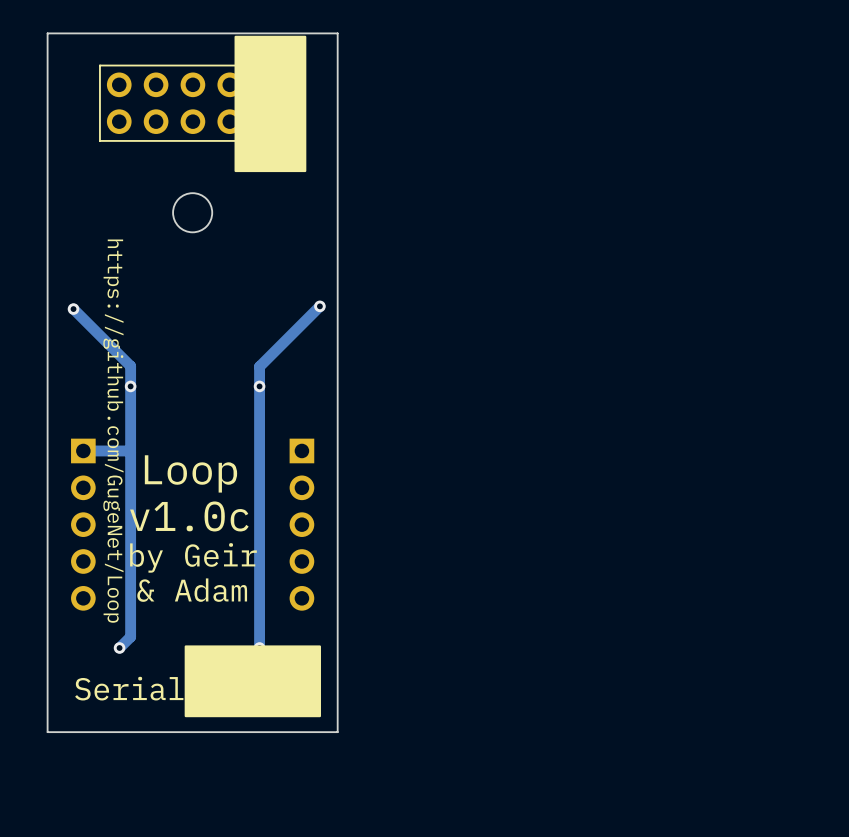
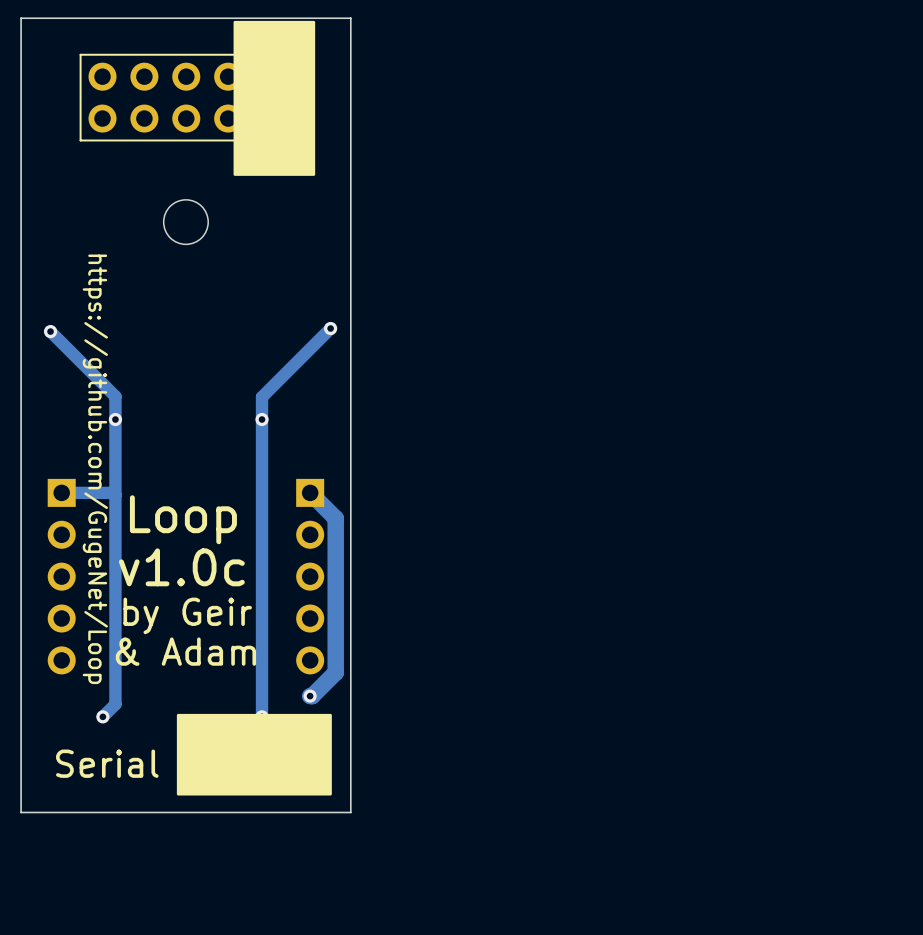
track: none -> (310, 492) (335, 518) (335, 672) (310, 696)
via: none -> (310, 696)

